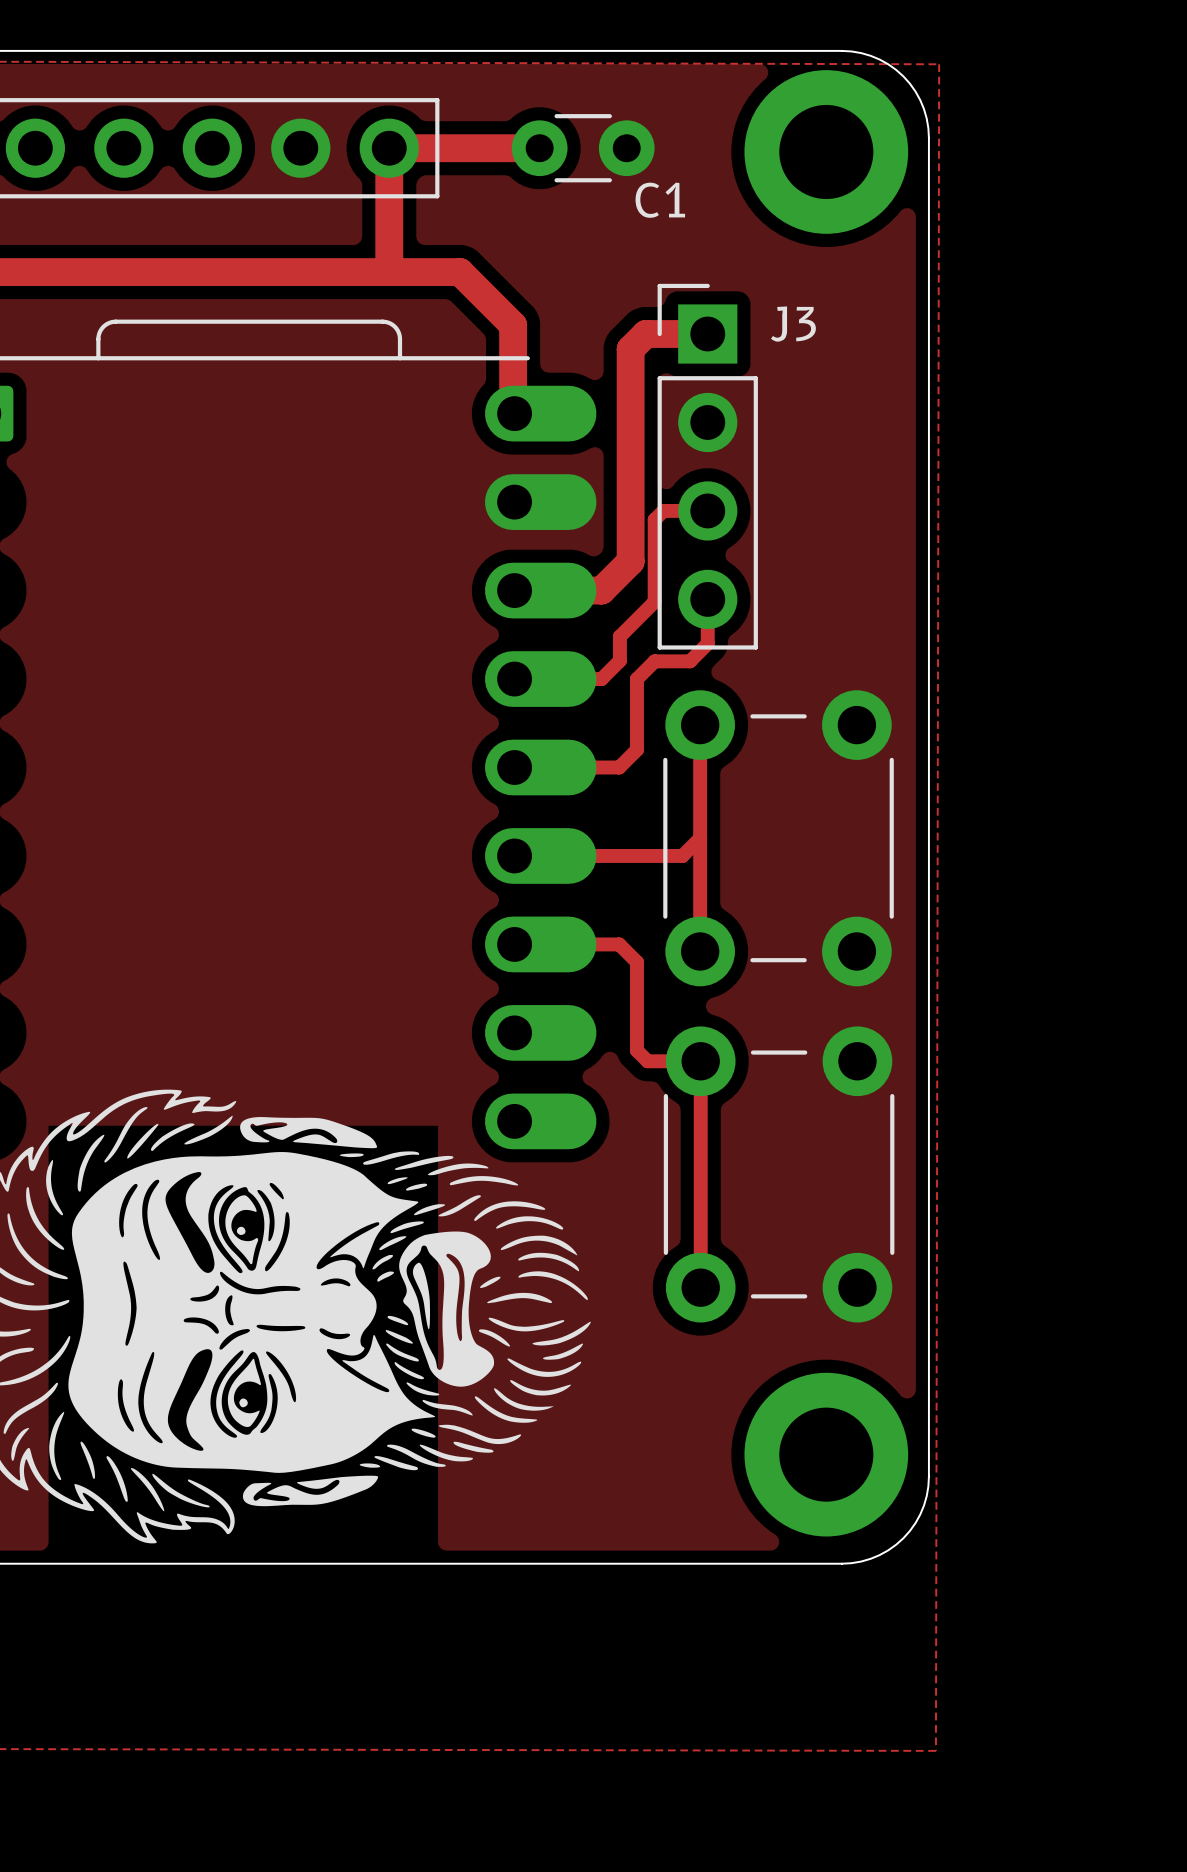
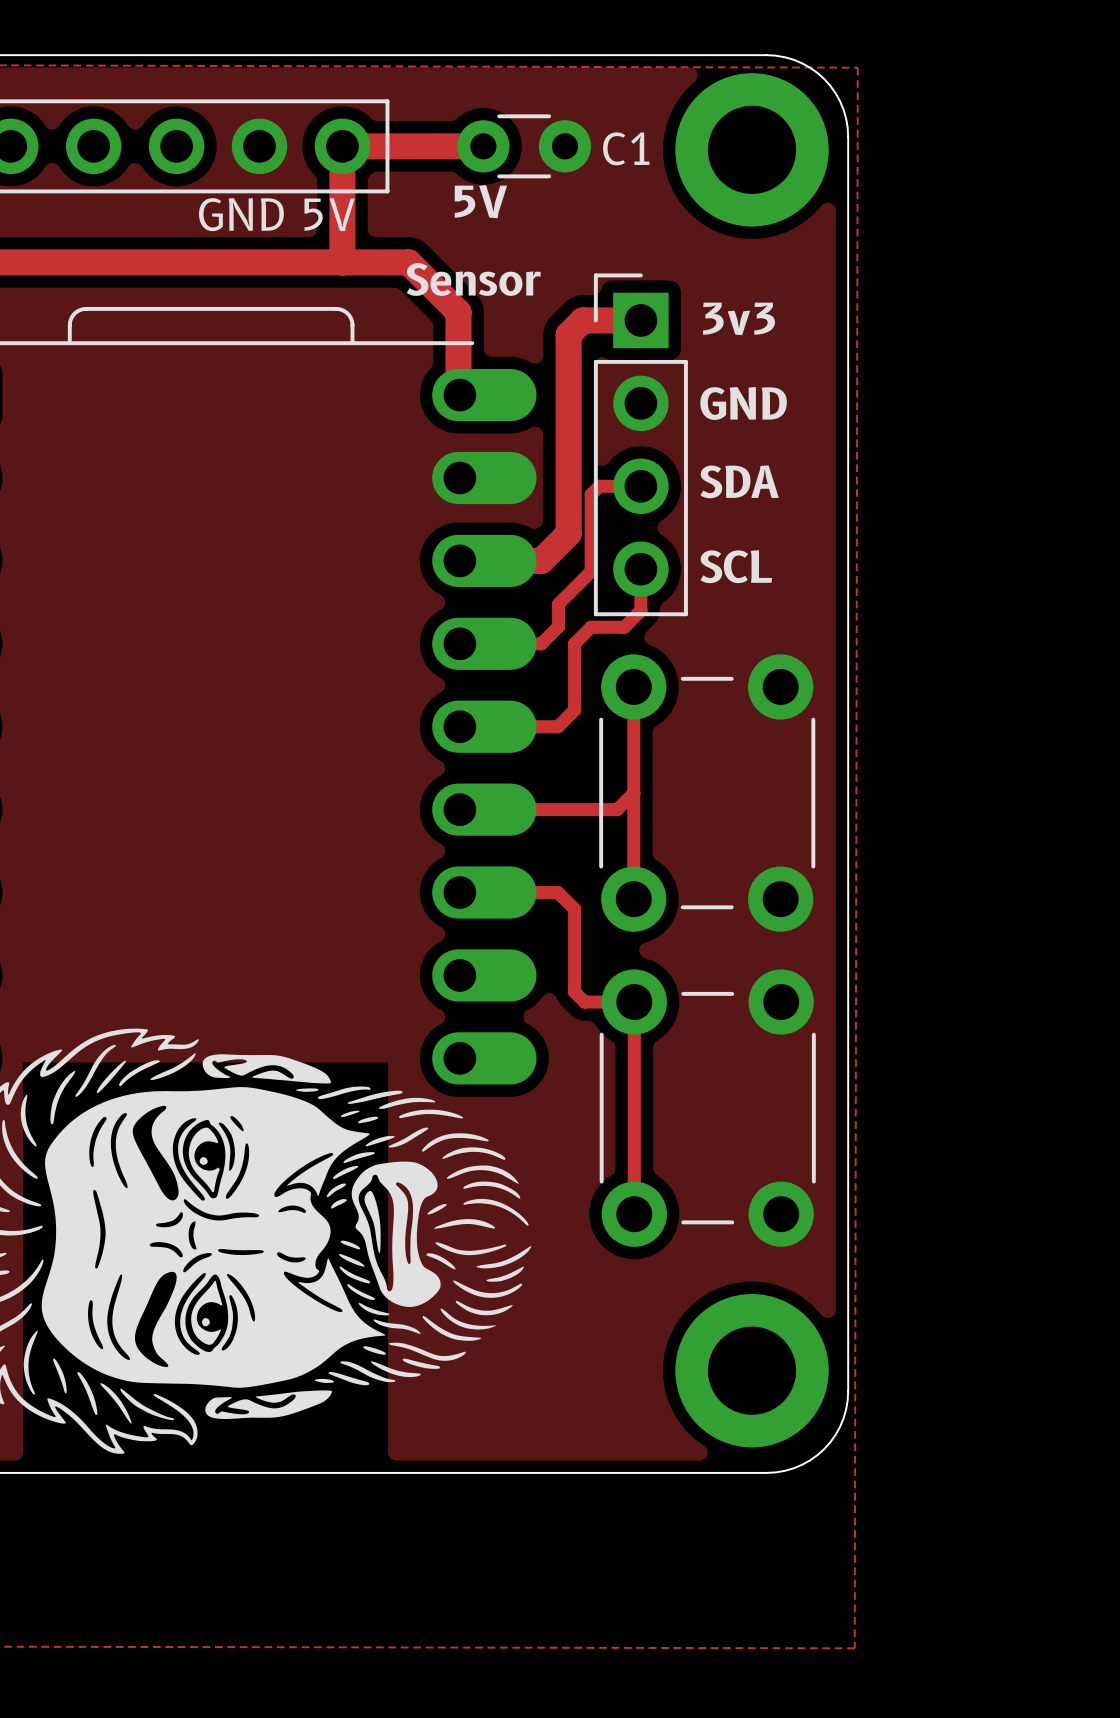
C1 name position: C1 (660, 200) -> C1 (626, 148)
text: none -> 5V (480, 201)
text: none -> GND 5V (276, 214)
text: none -> Sensor (473, 279)
J3 name: J3 (793, 324) -> none
text: none -> 3v3 (738, 318)
text: none -> GND (743, 403)
text: none -> SDA (739, 481)
text: none -> SCL (736, 566)

